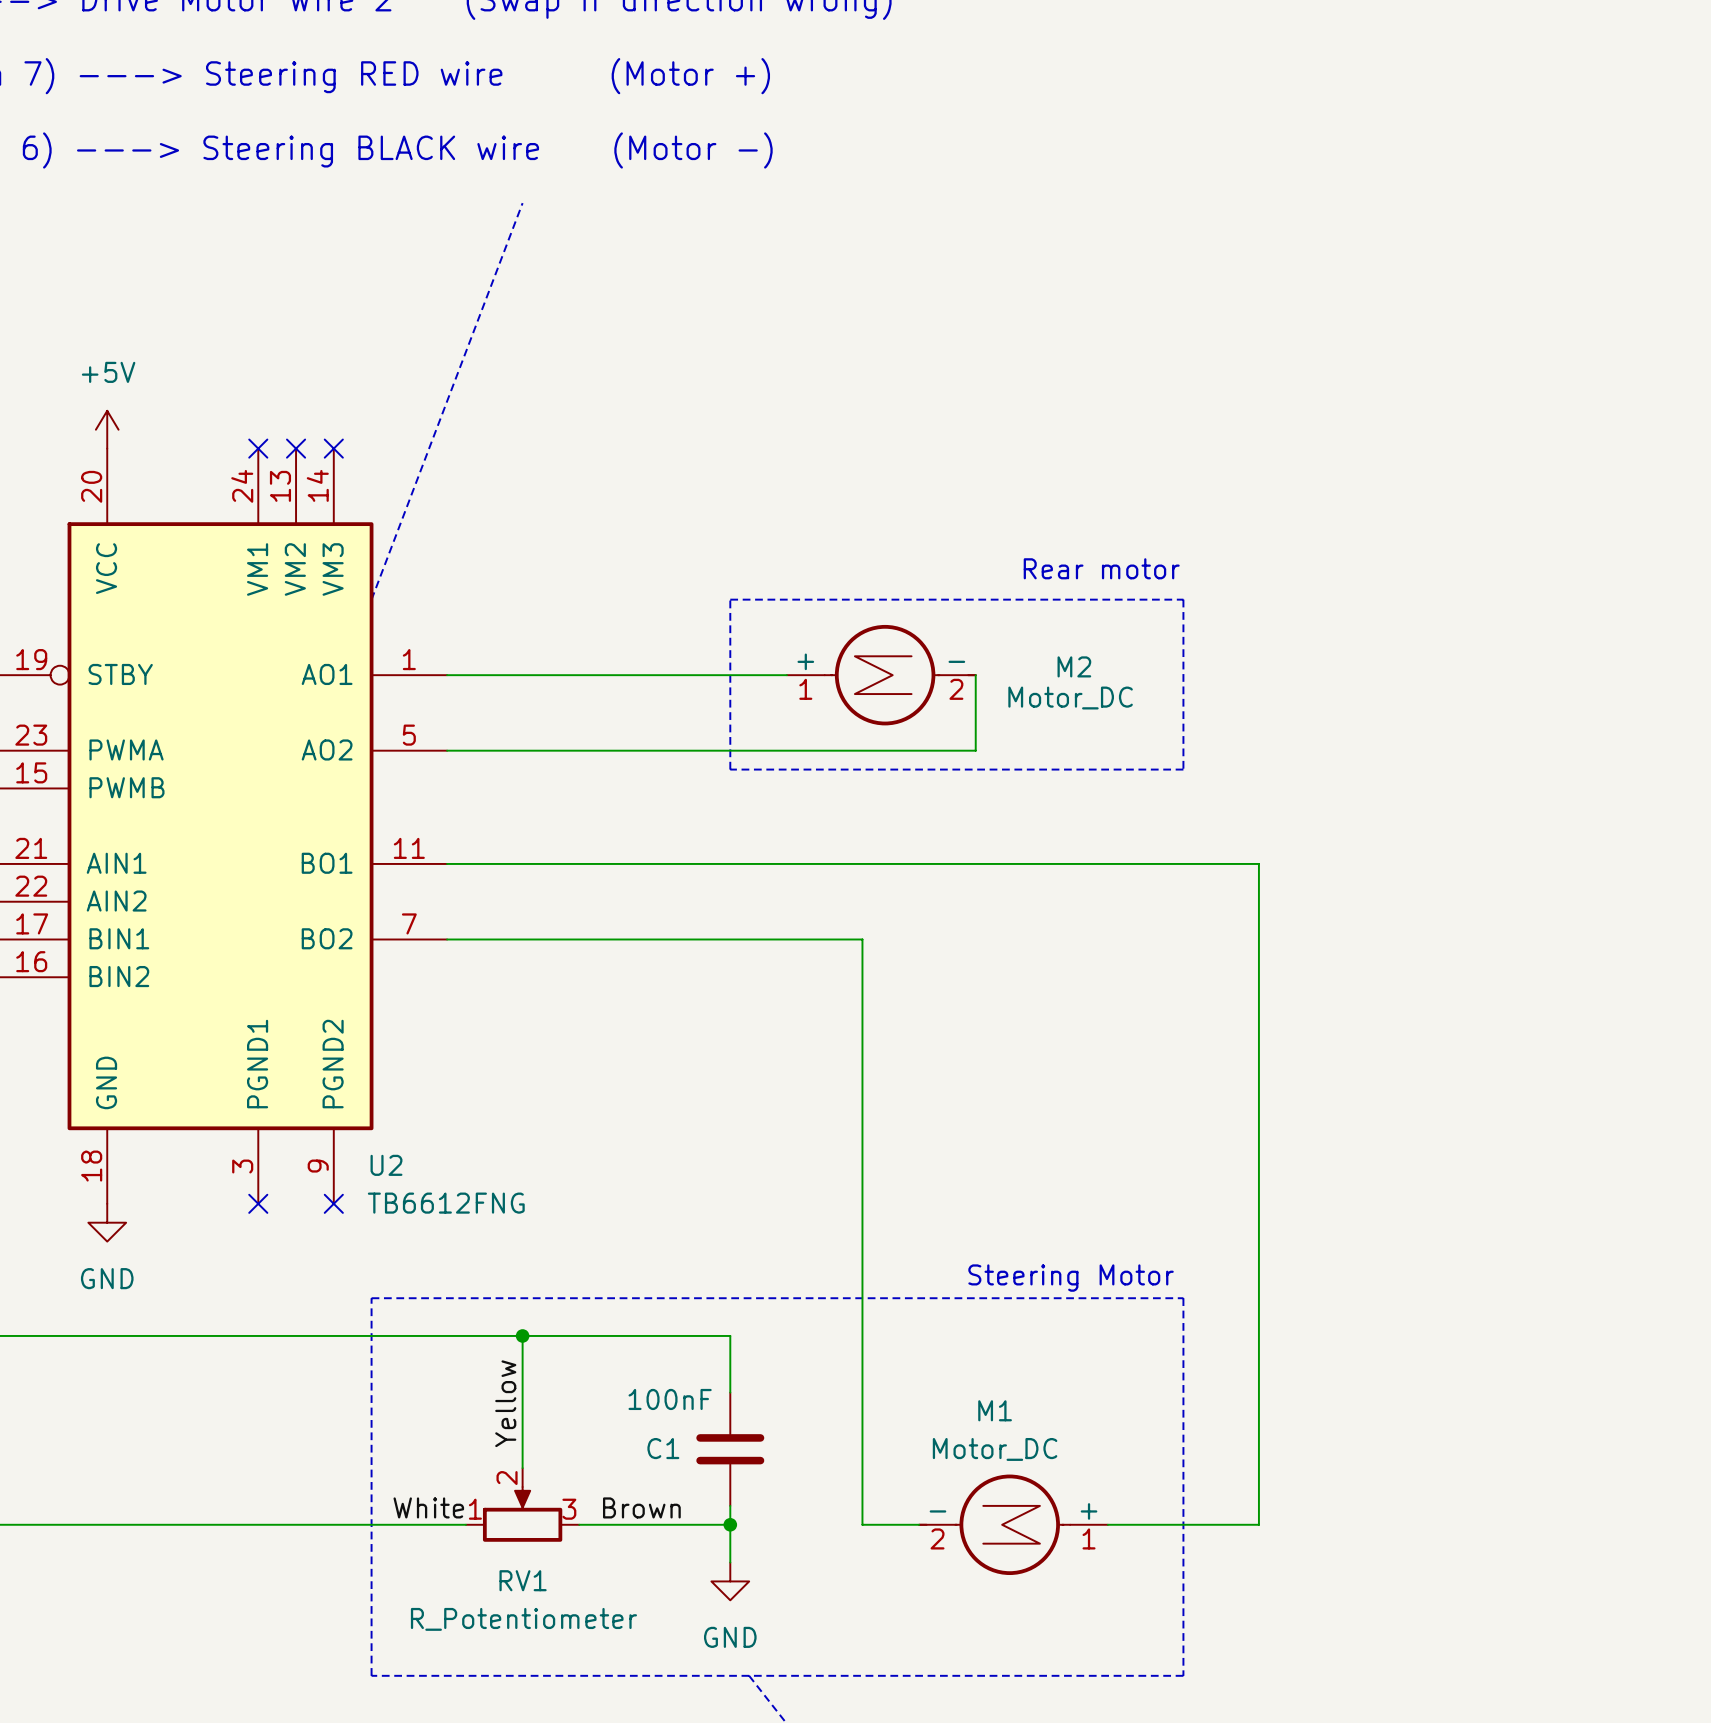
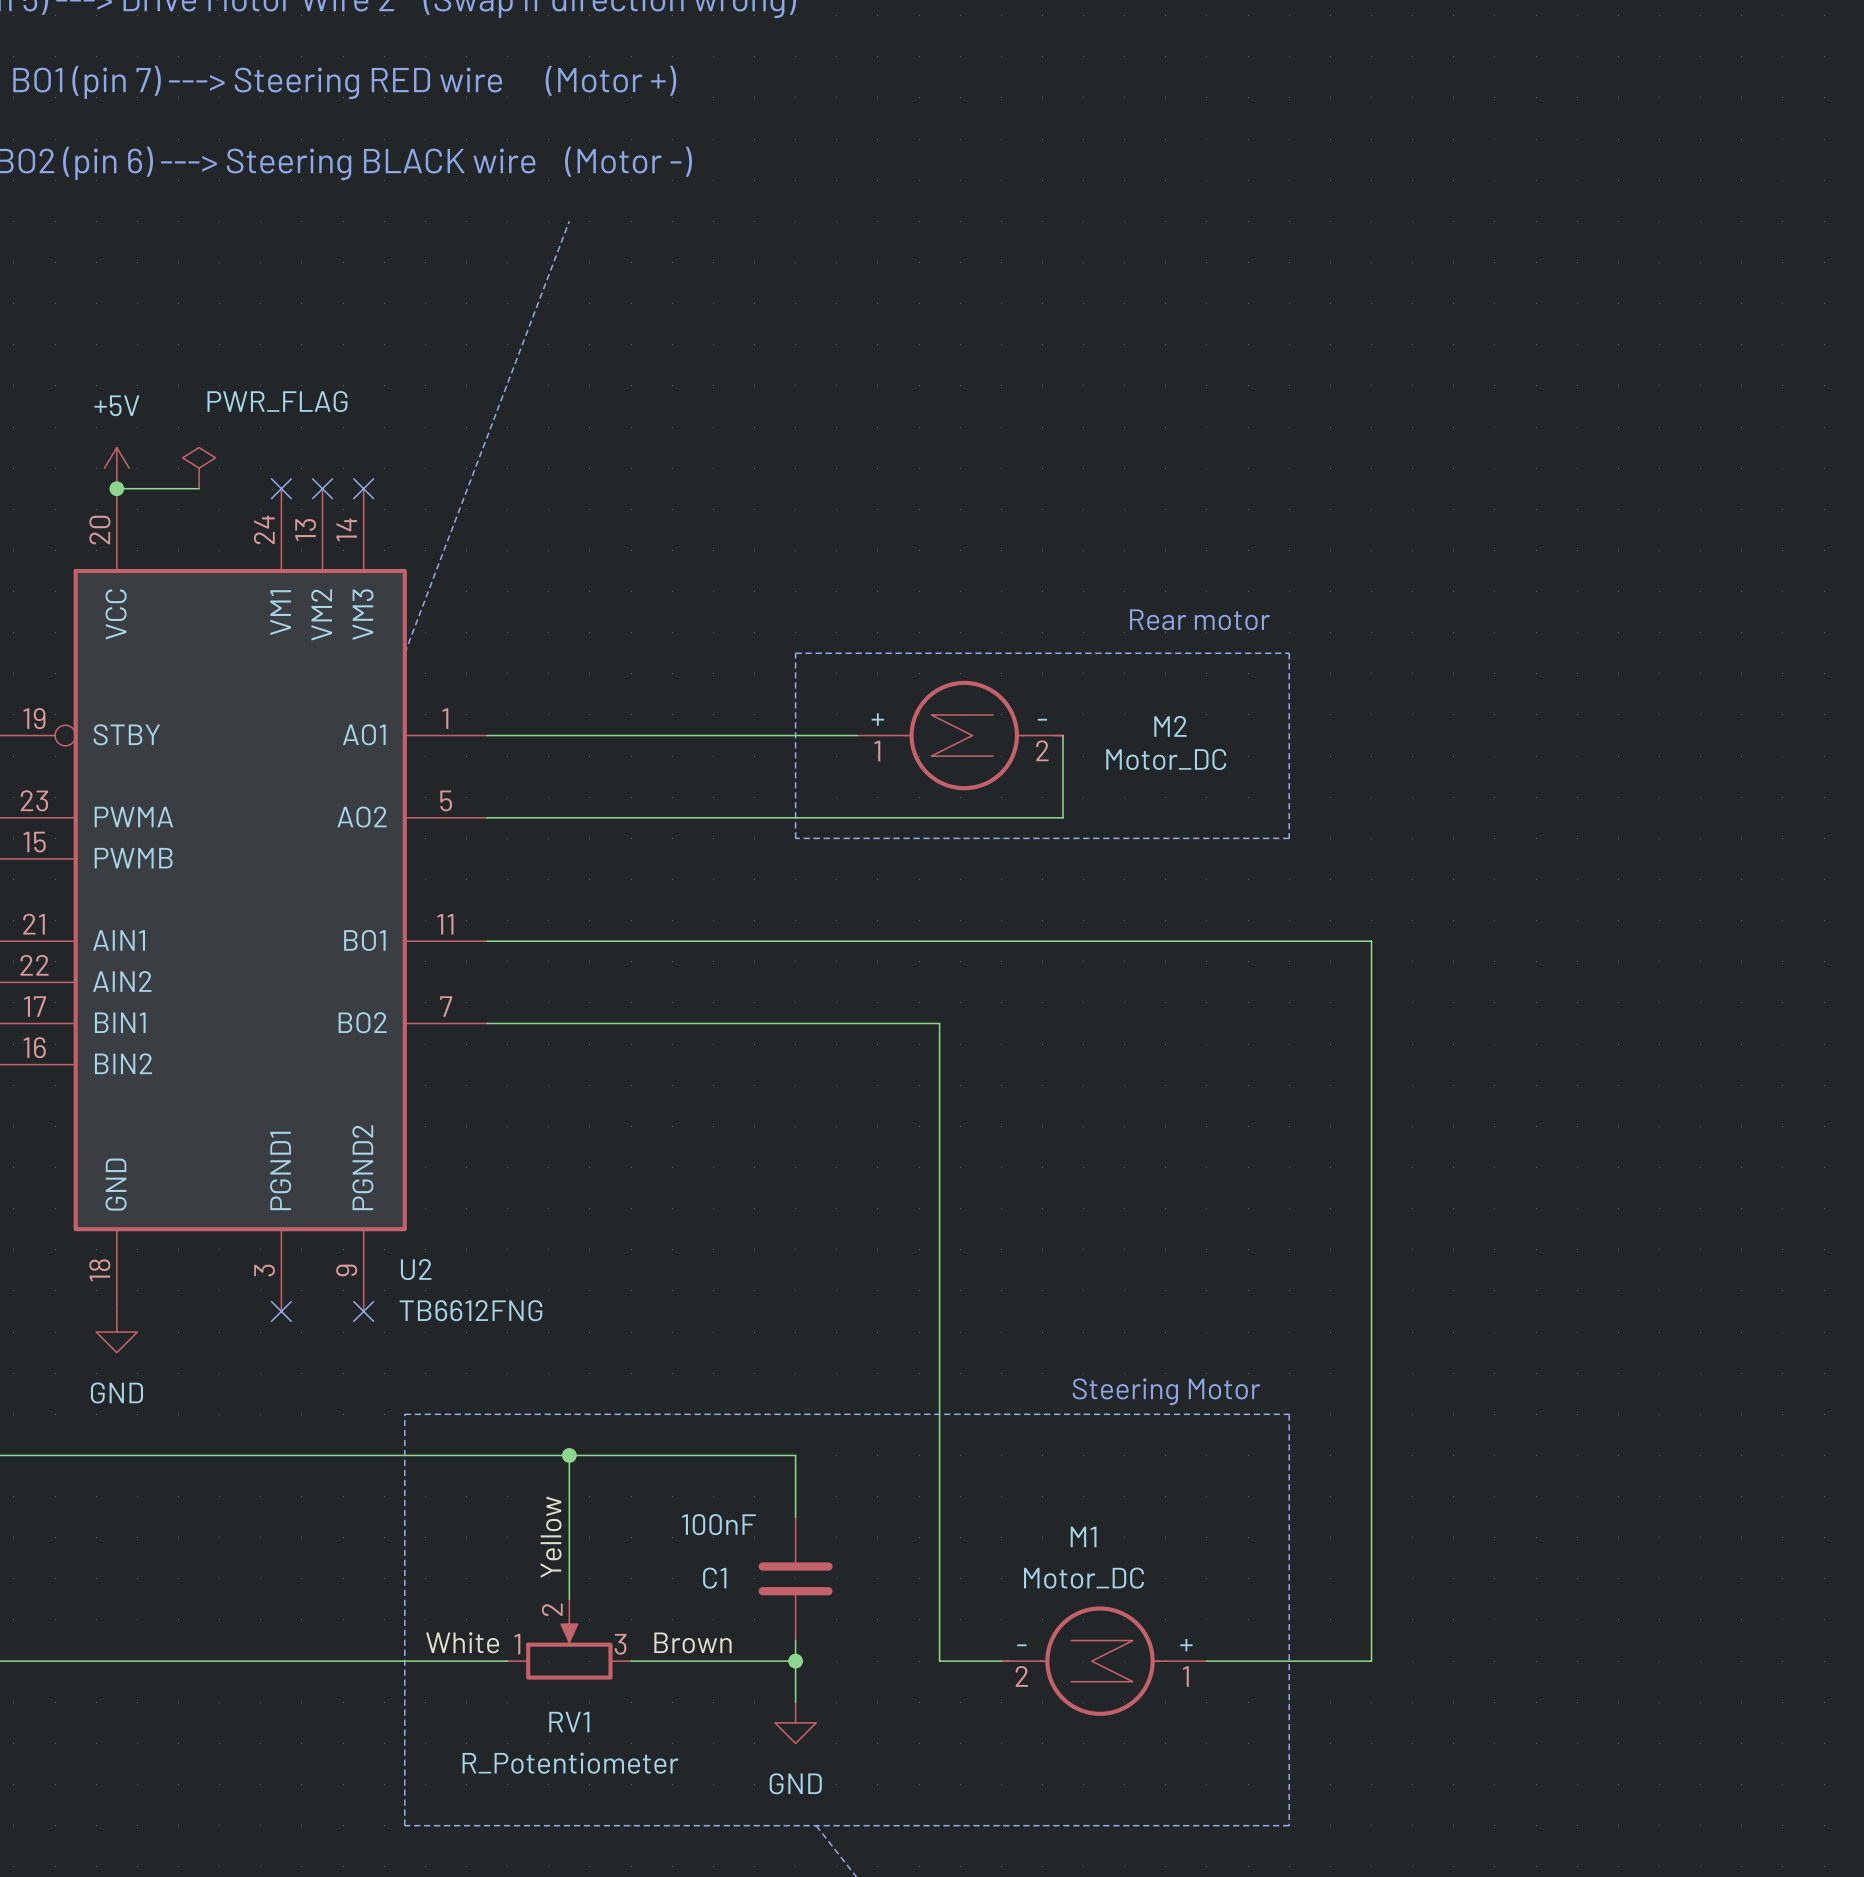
power symbol: none -> PWR_FLAG (199, 468)
wire: none -> (116, 488) (199, 488)
junction: none -> (116, 488)

